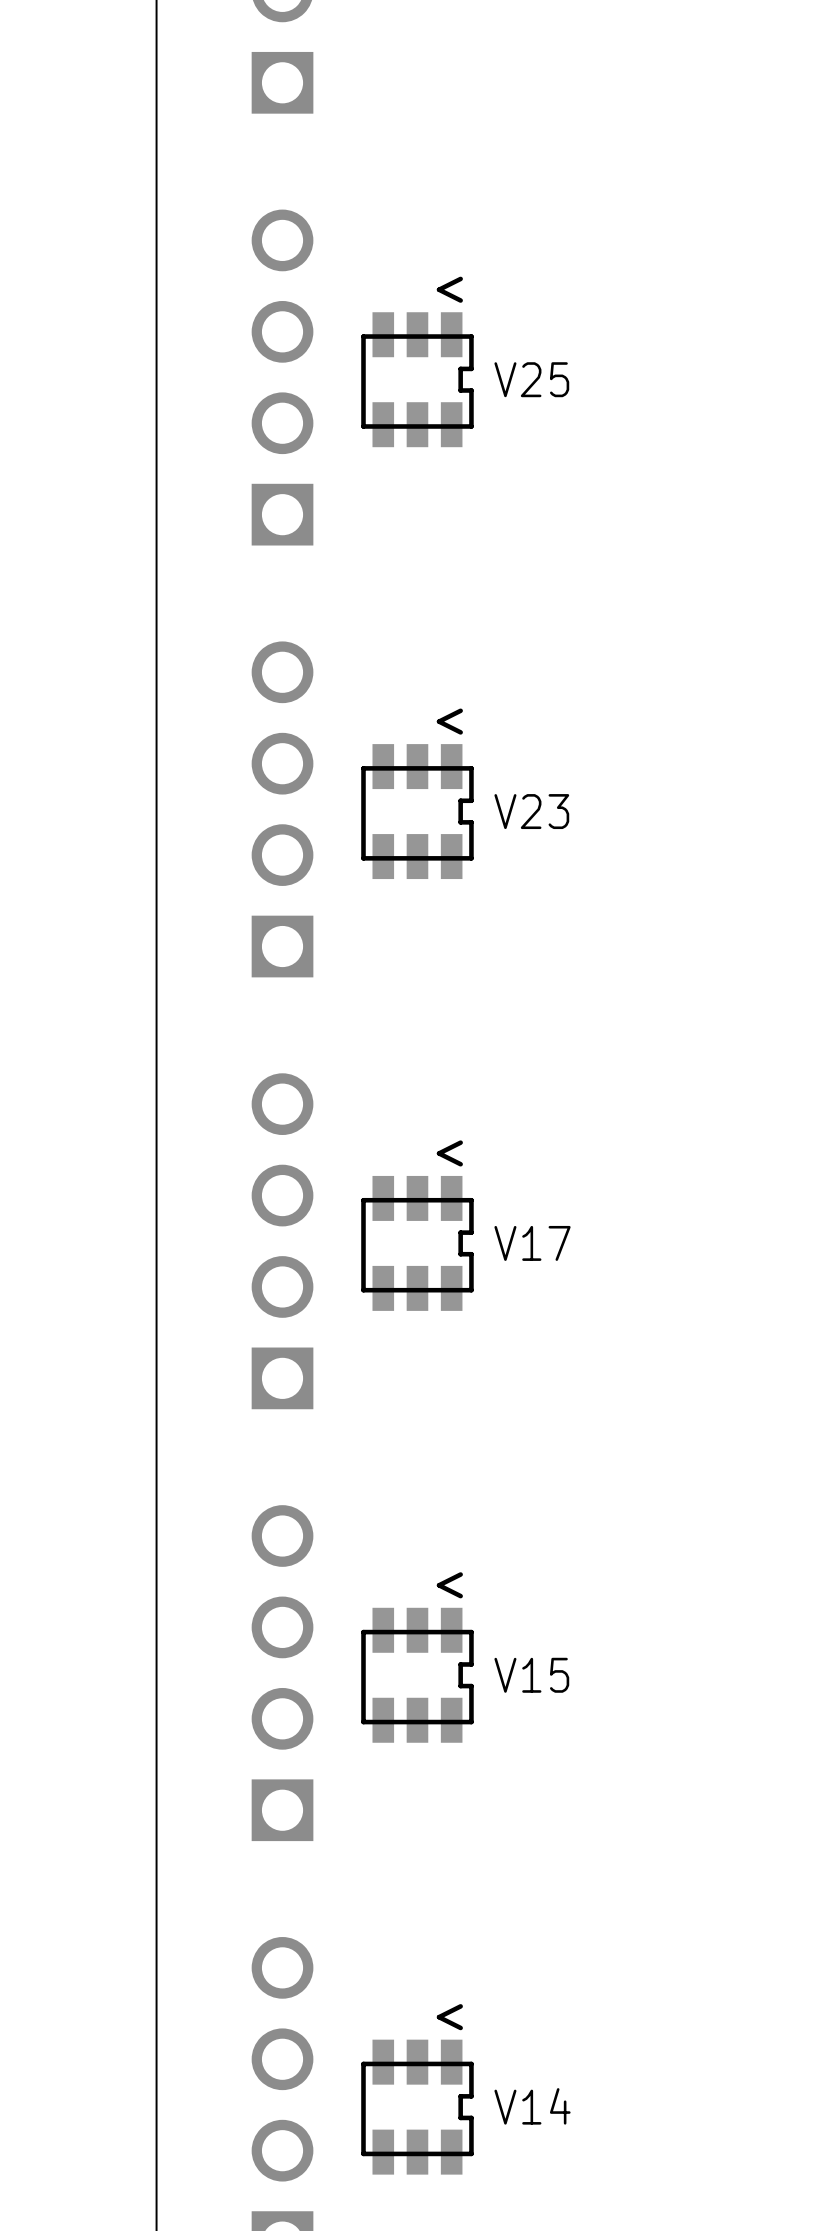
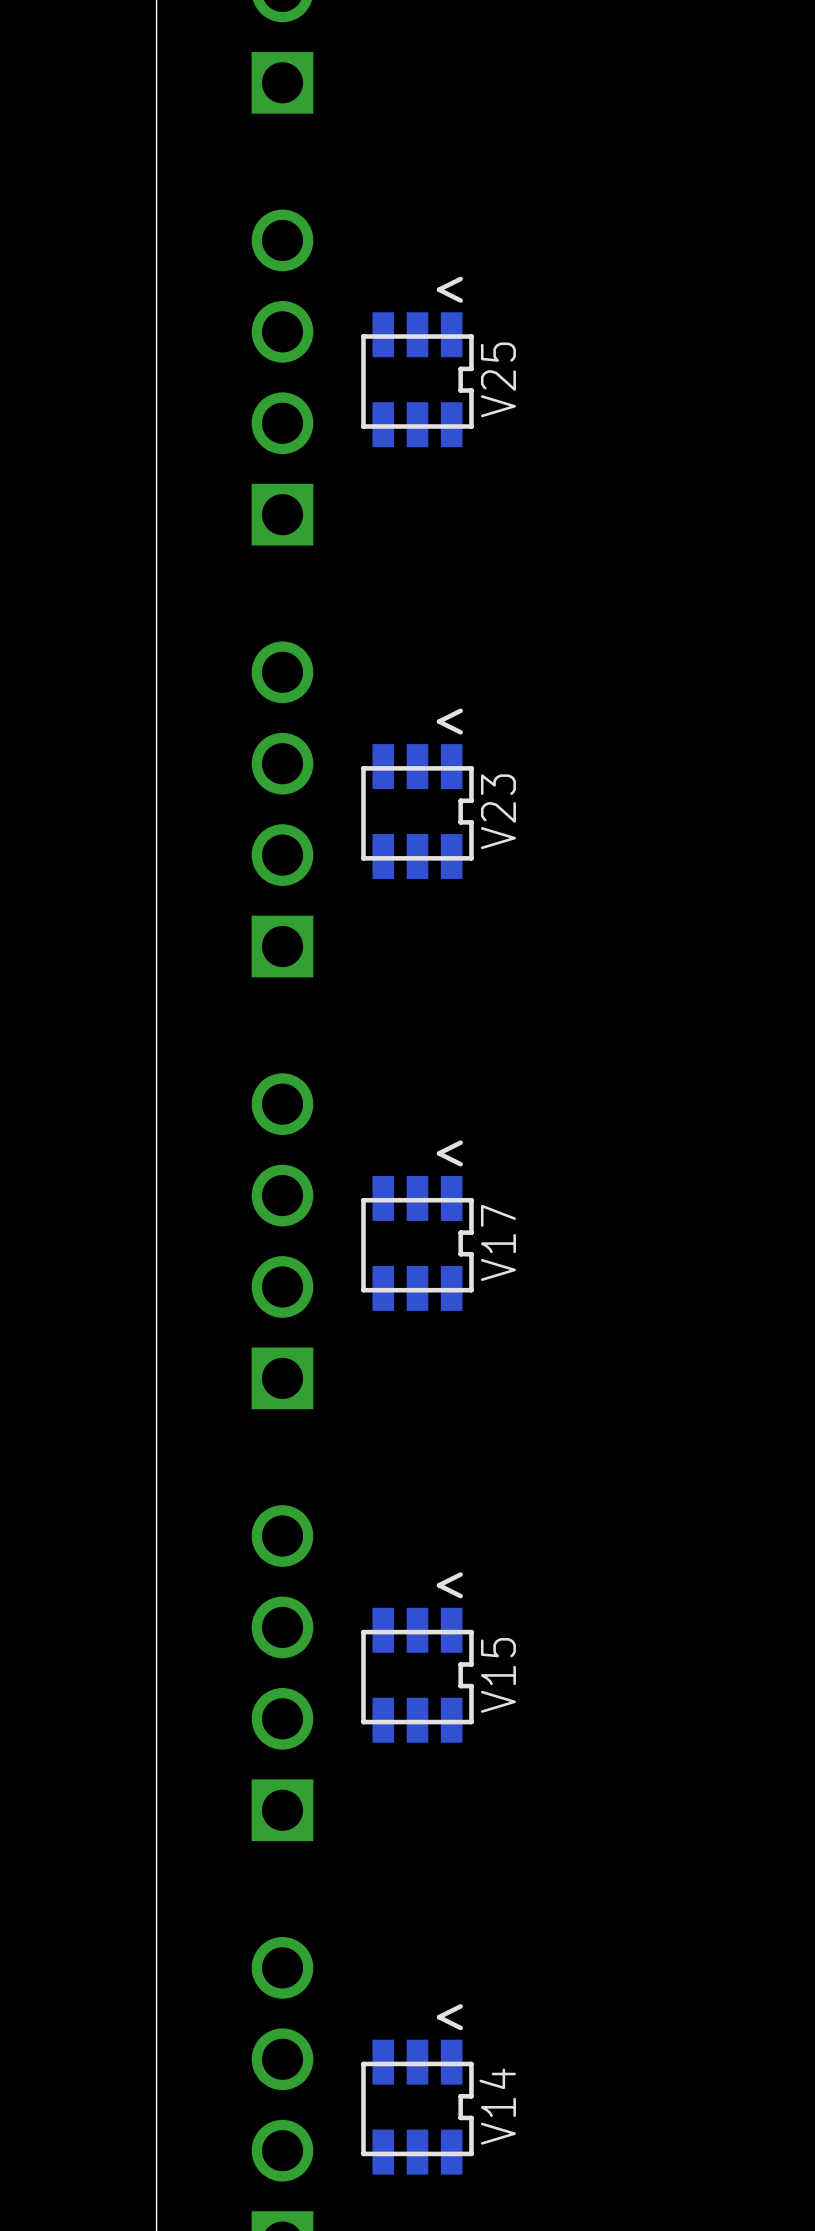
V25 name rotation: 0° (531, 379) -> 90° counterclockwise (498, 379)
V23 name rotation: 0° (531, 811) -> 90° counterclockwise (498, 811)
V17 name rotation: 0° (532, 1243) -> 90° counterclockwise (498, 1242)
V15 name rotation: 0° (531, 1675) -> 90° counterclockwise (498, 1675)
V14 name rotation: 0° (532, 2106) -> 90° counterclockwise (497, 2106)

